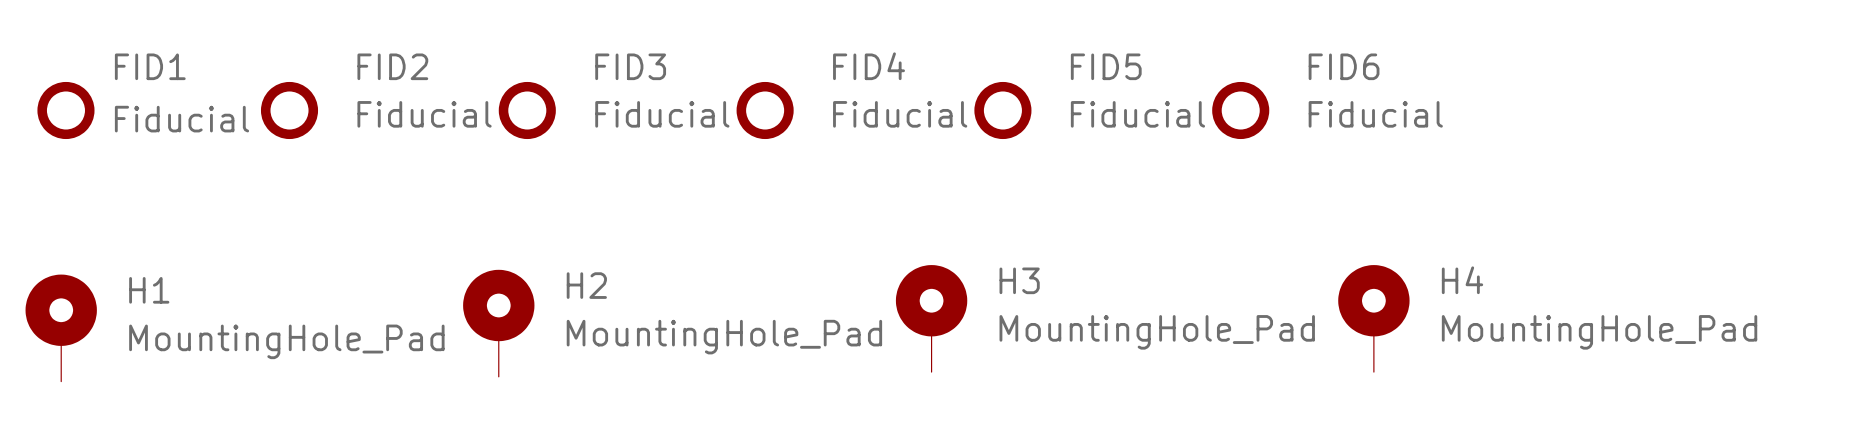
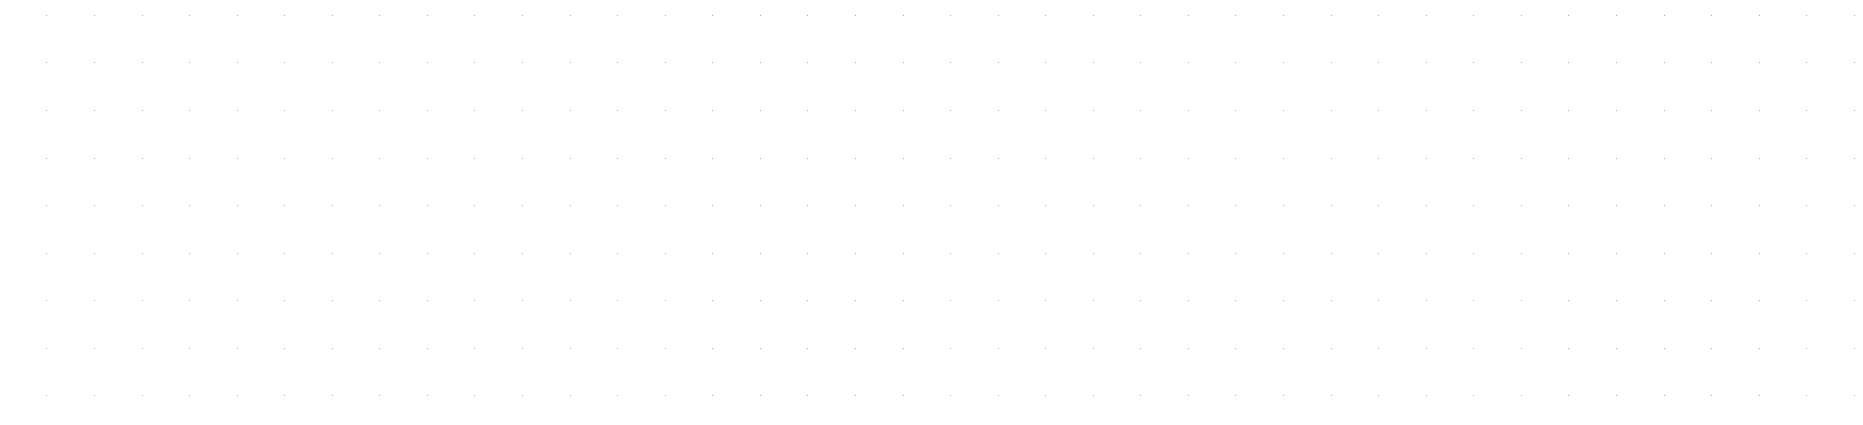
FID1: Fiducial (65, 110) -> none
FID2: Fiducial (289, 110) -> none
FID3: Fiducial (527, 110) -> none
FID4: Fiducial (765, 110) -> none
FID5: Fiducial (1002, 110) -> none
FID6: Fiducial (1240, 110) -> none
H3: MountingHole_Pad (931, 318) -> none
H4: MountingHole_Pad (1373, 318) -> none
H2: MountingHole_Pad (498, 323) -> none
H1: MountingHole_Pad (61, 328) -> none

